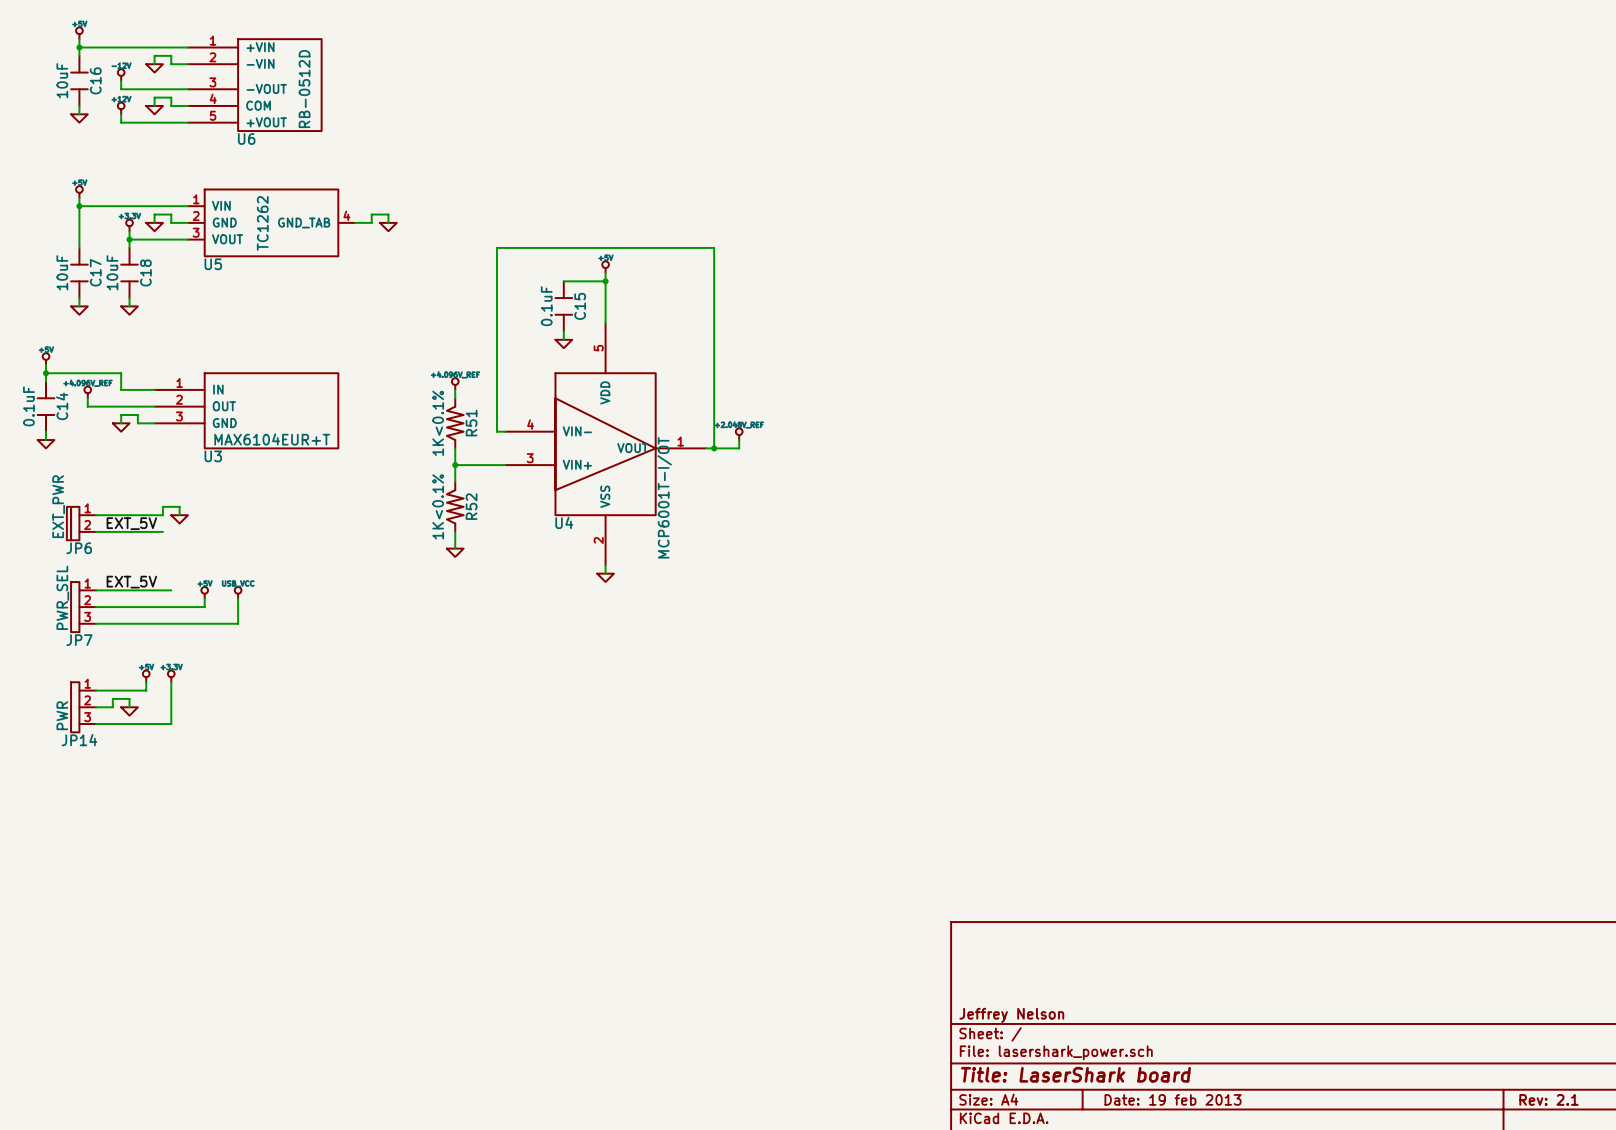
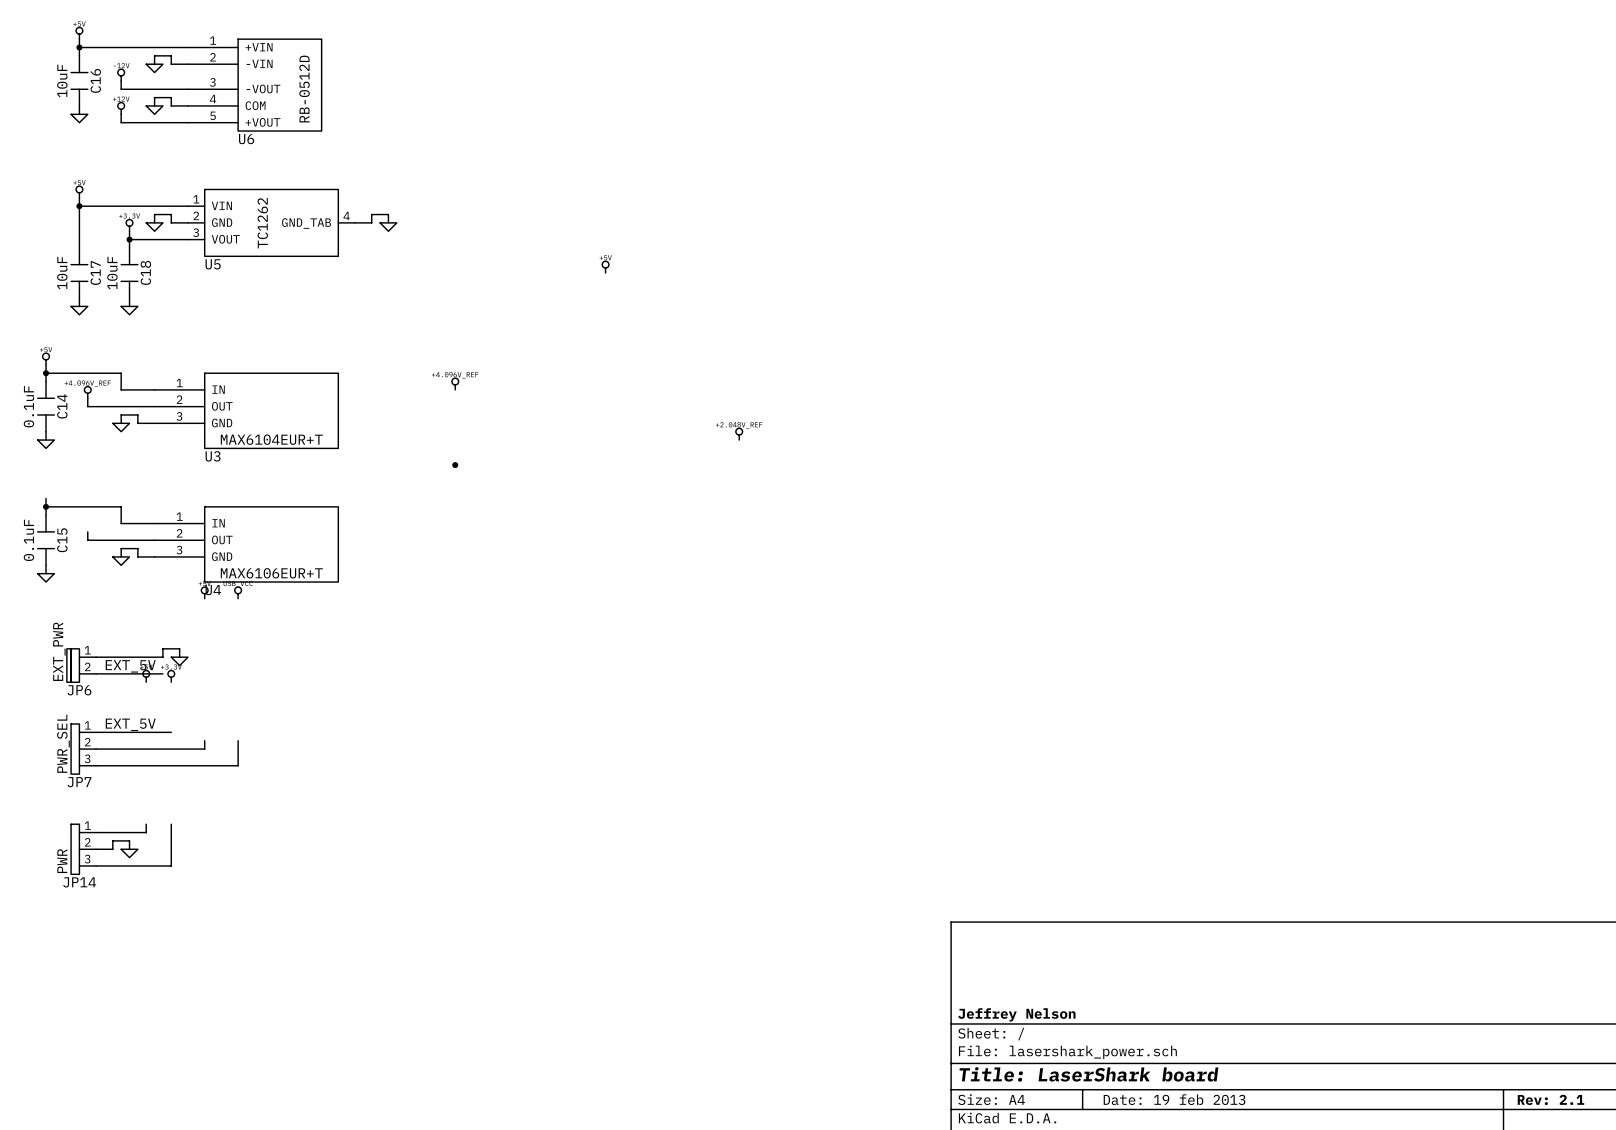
wire: (605, 273) (605, 323) -> none
wire: (563, 281) (605, 281) -> none
junction: (605, 281) -> none
C15 position: (563, 306) -> (46, 540)
U4 symbol: [505, 323, 706, 566] -> [154, 506, 339, 583]
wire: (563, 331) (563, 339) -> none
power symbol: (563, 343) -> none
wire: (455, 389) (455, 398) -> none
R51: 1K<0.1% (455, 423) -> none
wire: (505, 431) (497, 431) (497, 247) (714, 247) (714, 448) -> none
wire: (739, 440) (739, 448) (705, 448) -> none
wire: (455, 448) (455, 481) -> none
junction: (714, 448) -> none
wire: (455, 465) (505, 465) -> none
U4 value: MCP6001T-I/OT (664, 497) -> MAX6106EUR+T (271, 573)
wire: none -> (46, 498) (46, 515)
wire: none -> (46, 506) (121, 506) (121, 523) (154, 523)
junction: none -> (46, 506)
R52: 1K<0.1% (455, 506) -> none
wire: (96, 515) (162, 515) (162, 506) (179, 506) (179, 515) -> (96, 657) (162, 657) (162, 648) (179, 648) (179, 657)
power symbol: (179, 519) -> none
U4 name position: U4 (564, 522) -> U4 (213, 590)
JP6 position: (81, 523) -> (81, 665)
label: EXT_5V (131, 523) -> none
wire: none -> (87, 531) (87, 540) (154, 540)
wire: (96, 531) (162, 531) -> (96, 673) (162, 673)
wire: (455, 531) (455, 548) -> none
power symbol: (455, 552) -> none
wire: none -> (121, 556) (121, 548) (137, 548) (137, 556) (154, 556)
power symbol: none -> (121, 561)
wire: none -> (46, 565) (46, 573)
wire: (605, 565) (605, 573) -> none
power symbol: none -> (46, 577)
power symbol: (605, 577) -> none
label: EXT_5V (131, 582) -> none
wire: (96, 590) (171, 590) -> (96, 732) (171, 732)
wire: (204, 598) (204, 607) (96, 607) -> (204, 740) (204, 749) (96, 749)
wire: (238, 598) (238, 623) (96, 623) -> (238, 740) (238, 765) (96, 765)
JP7 position: (83, 607) -> (83, 749)
label: none -> EXT_5V (130, 666)
wire: (146, 682) (146, 690) (96, 690) -> (146, 824) (146, 832) (96, 832)
wire: (171, 682) (171, 724) (96, 724) -> (171, 824) (171, 865) (96, 865)
JP14 position: (83, 707) -> (83, 849)
wire: (96, 707) (112, 707) (112, 698) (129, 698) (129, 707) -> (96, 849) (112, 849) (112, 840) (129, 840) (129, 849)
power symbol position: (129, 711) -> (179, 661)
label: none -> EXT_5V (130, 724)
power symbol: none -> (129, 853)

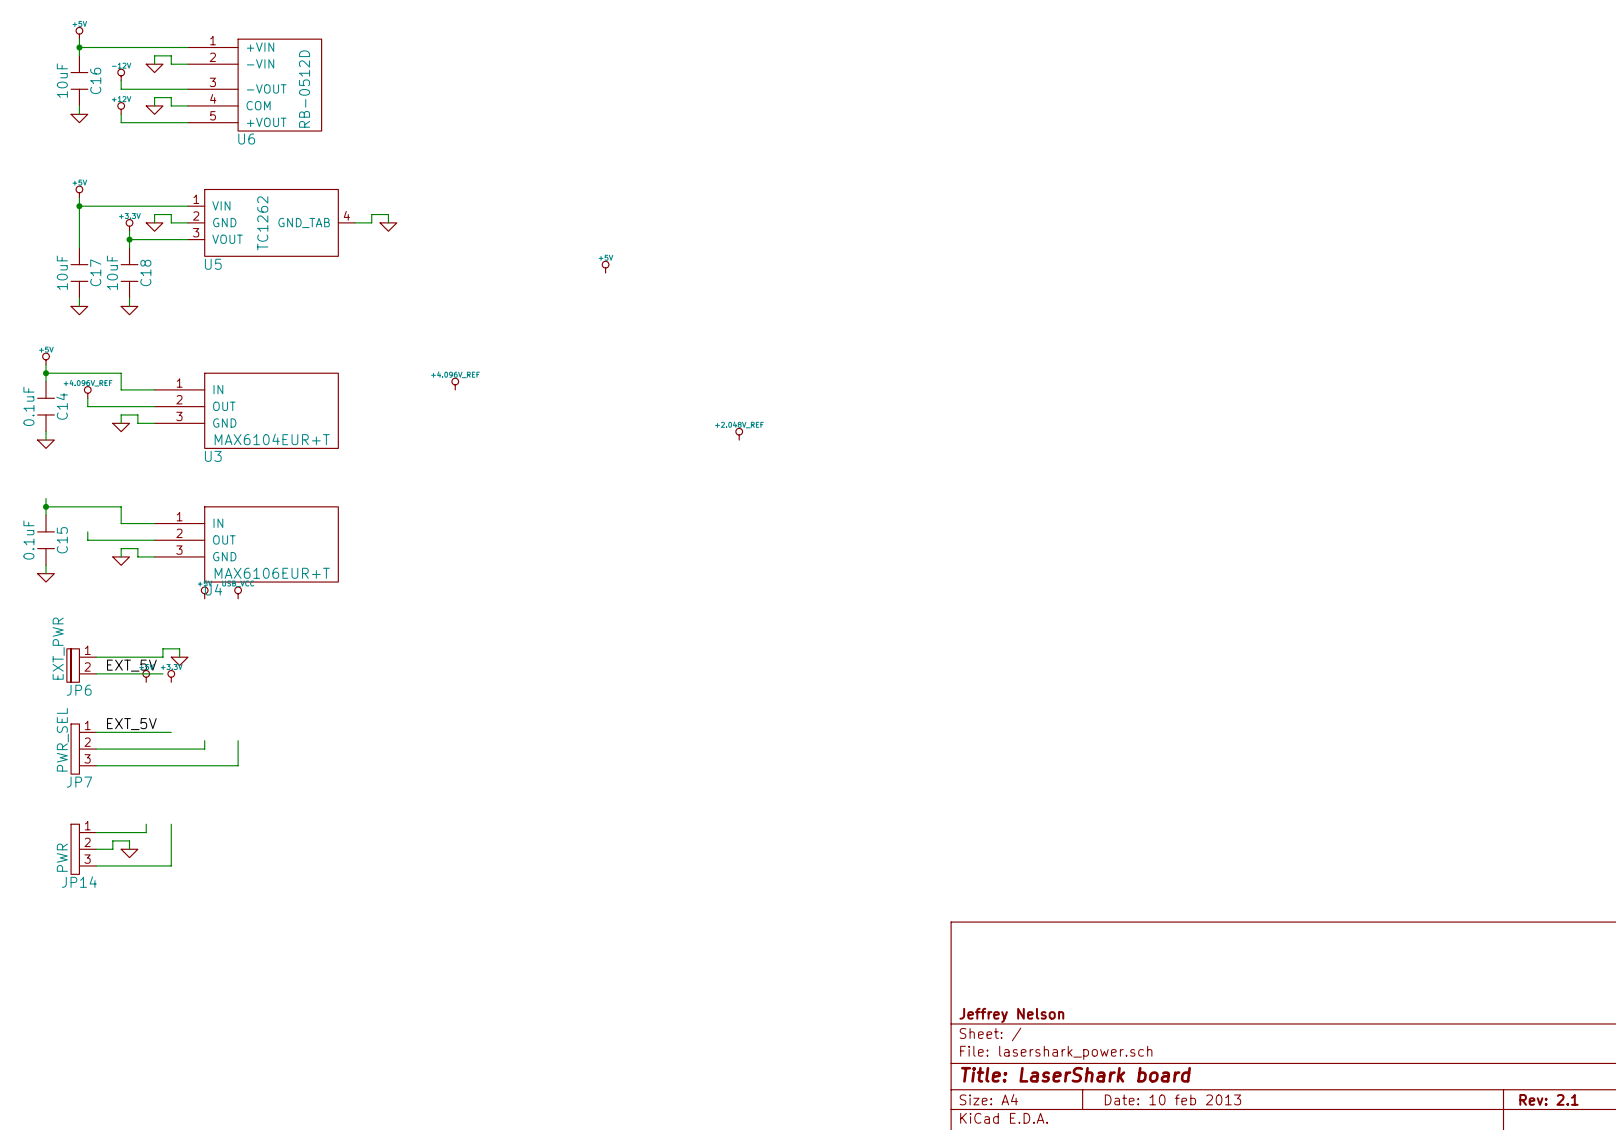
junction: (455, 465) -> none
title block: Date: 19 feb 2013 (1174, 1099) -> Date: 10 feb 2013 (1173, 1099)

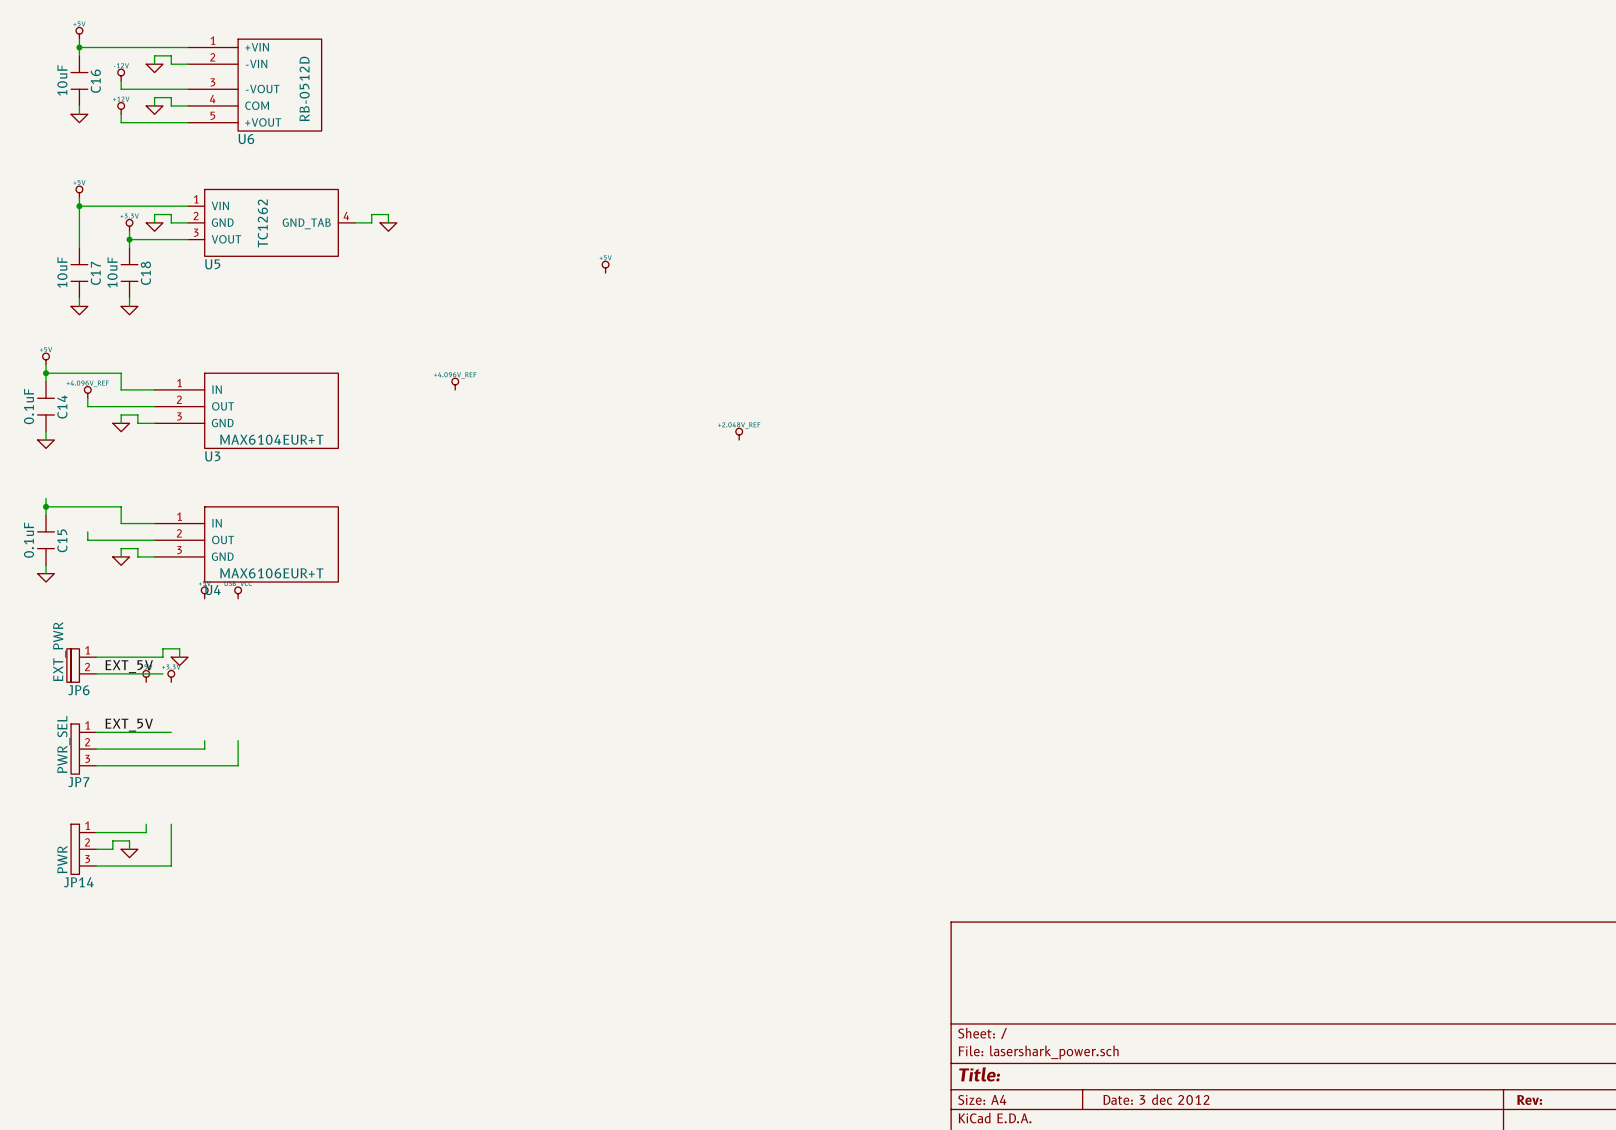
title block: Jeffrey Nelson (1011, 1015) -> none
title block: Title: LaserShark board (1075, 1074) -> Title: (979, 1074)
title block: Date: 10 feb 2013 (1173, 1099) -> Date: 3 dec 2012 (1156, 1099)
title block: Rev: 2.1 (1548, 1099) -> Rev: (1529, 1100)

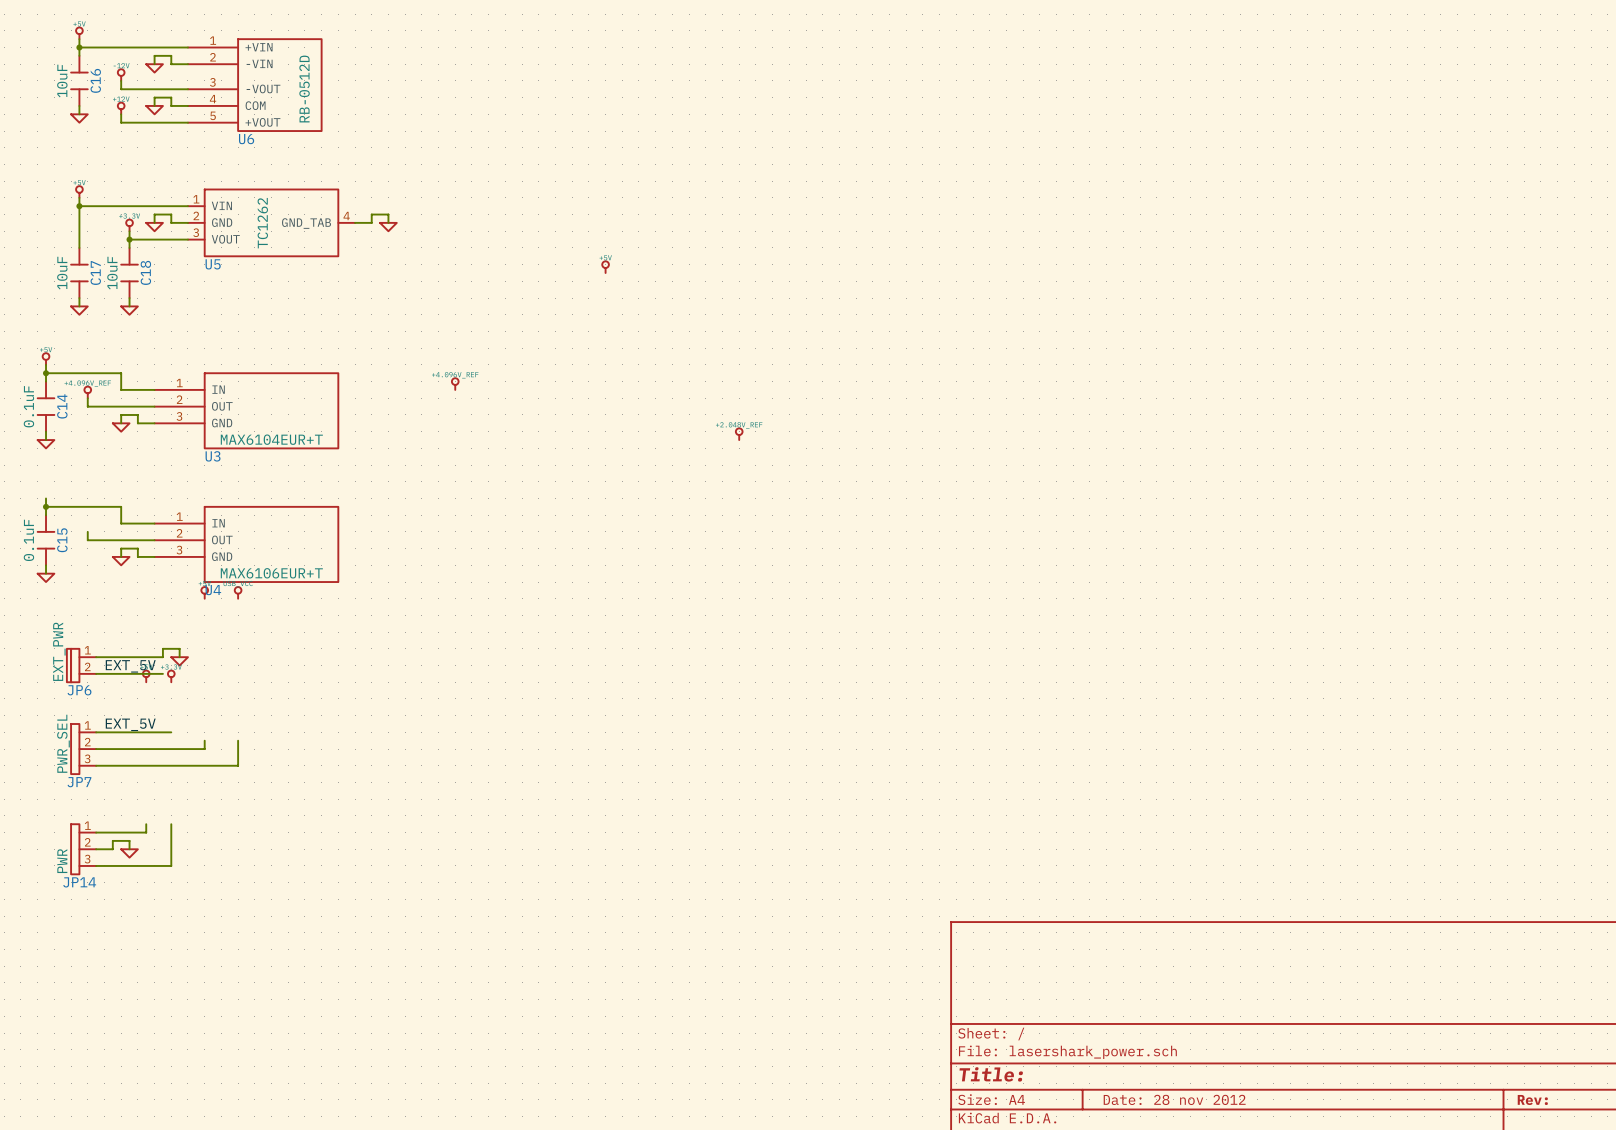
title block: Date: 3 dec 2012 (1156, 1099) -> Date: 28 nov 2012 (1174, 1099)

